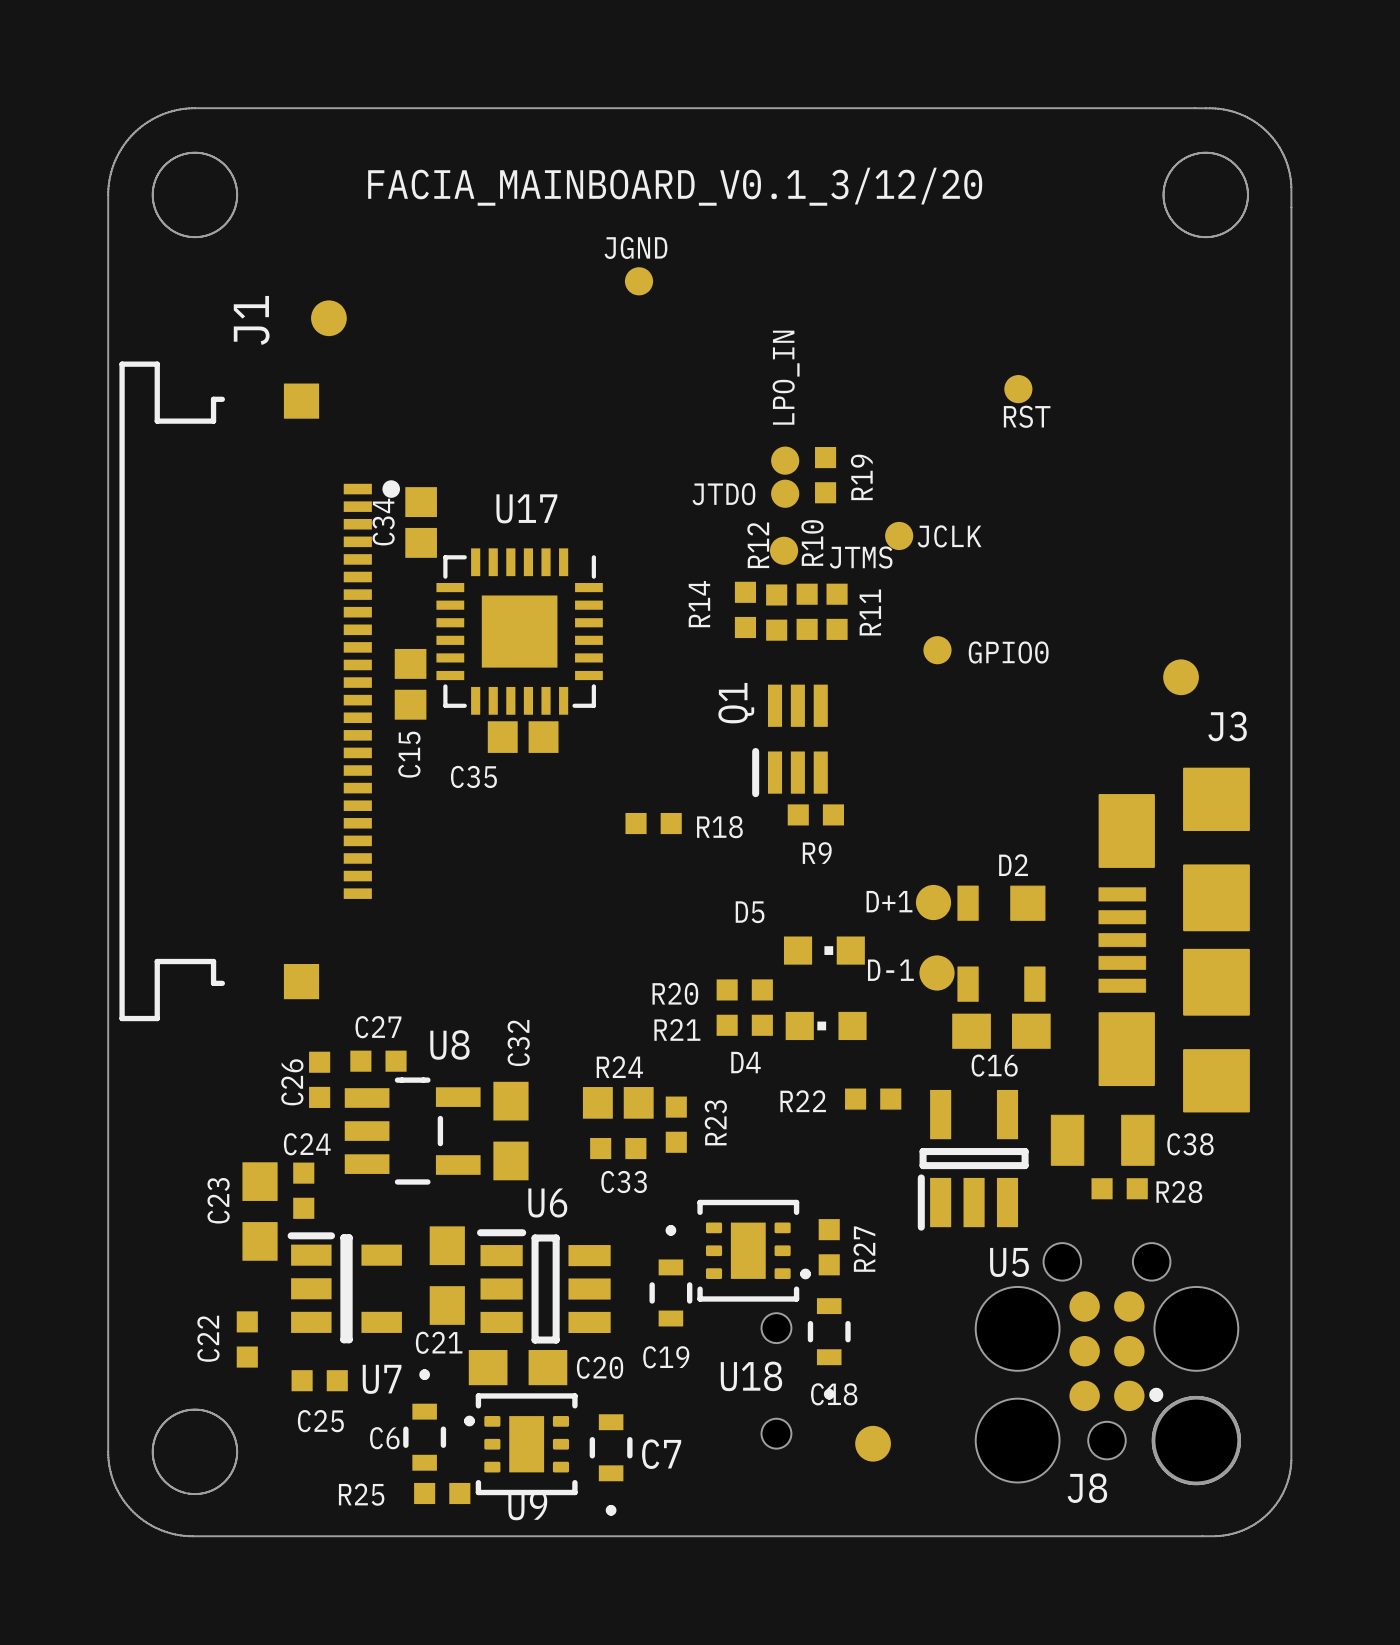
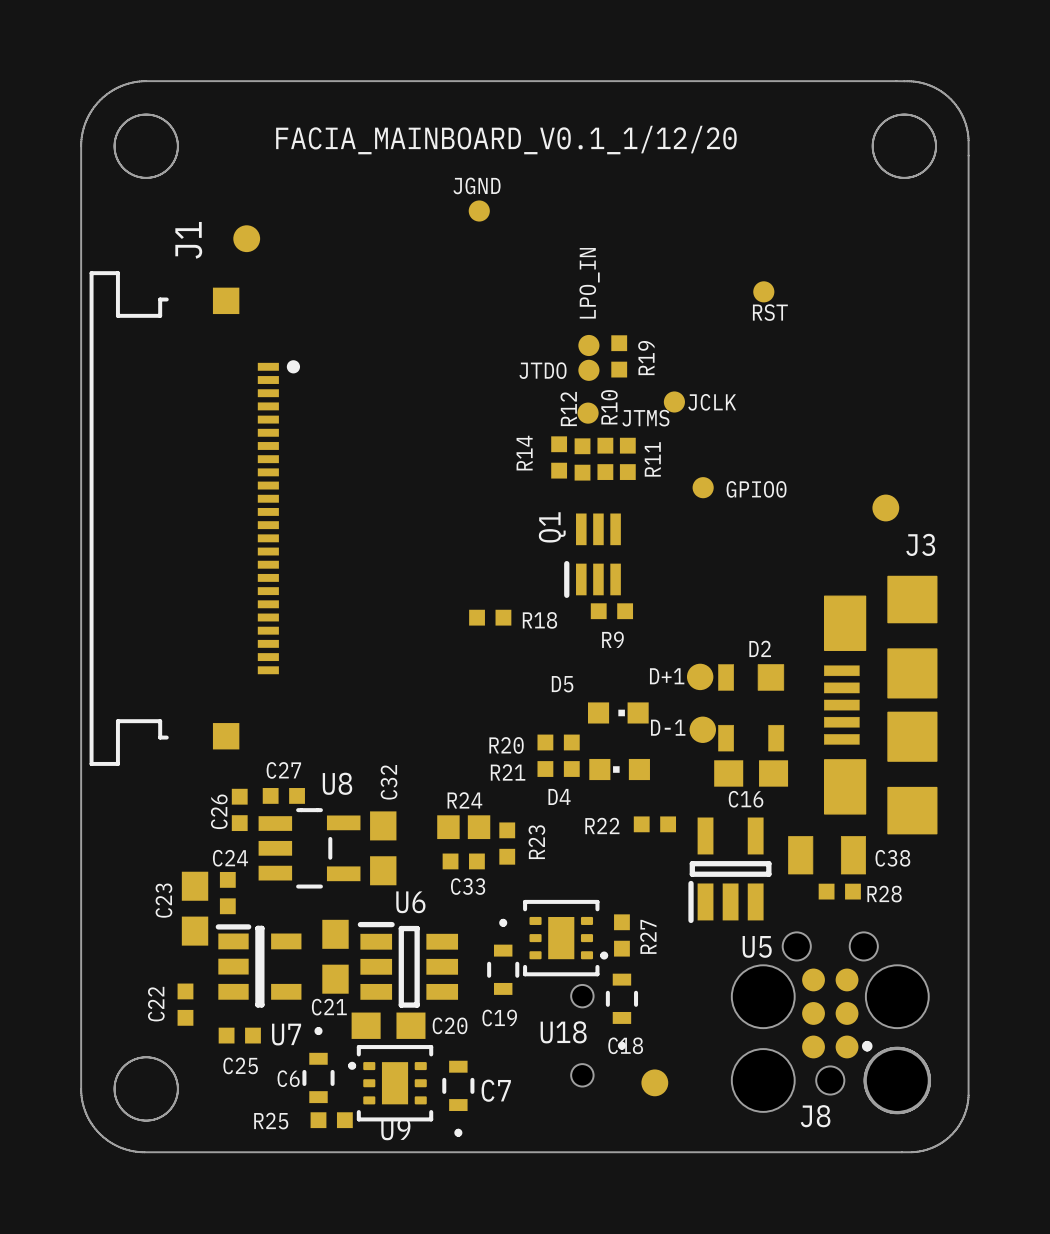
text: FACIA_MAINBOARD_V0.1_3/12/20 (675, 186) -> FACIA_MAINBOARD_V0.1_1/12/20 (506, 140)
C34: (421, 522) -> none
U17: (519, 631) -> none
C15: (410, 684) -> none
C35: (523, 737) -> none

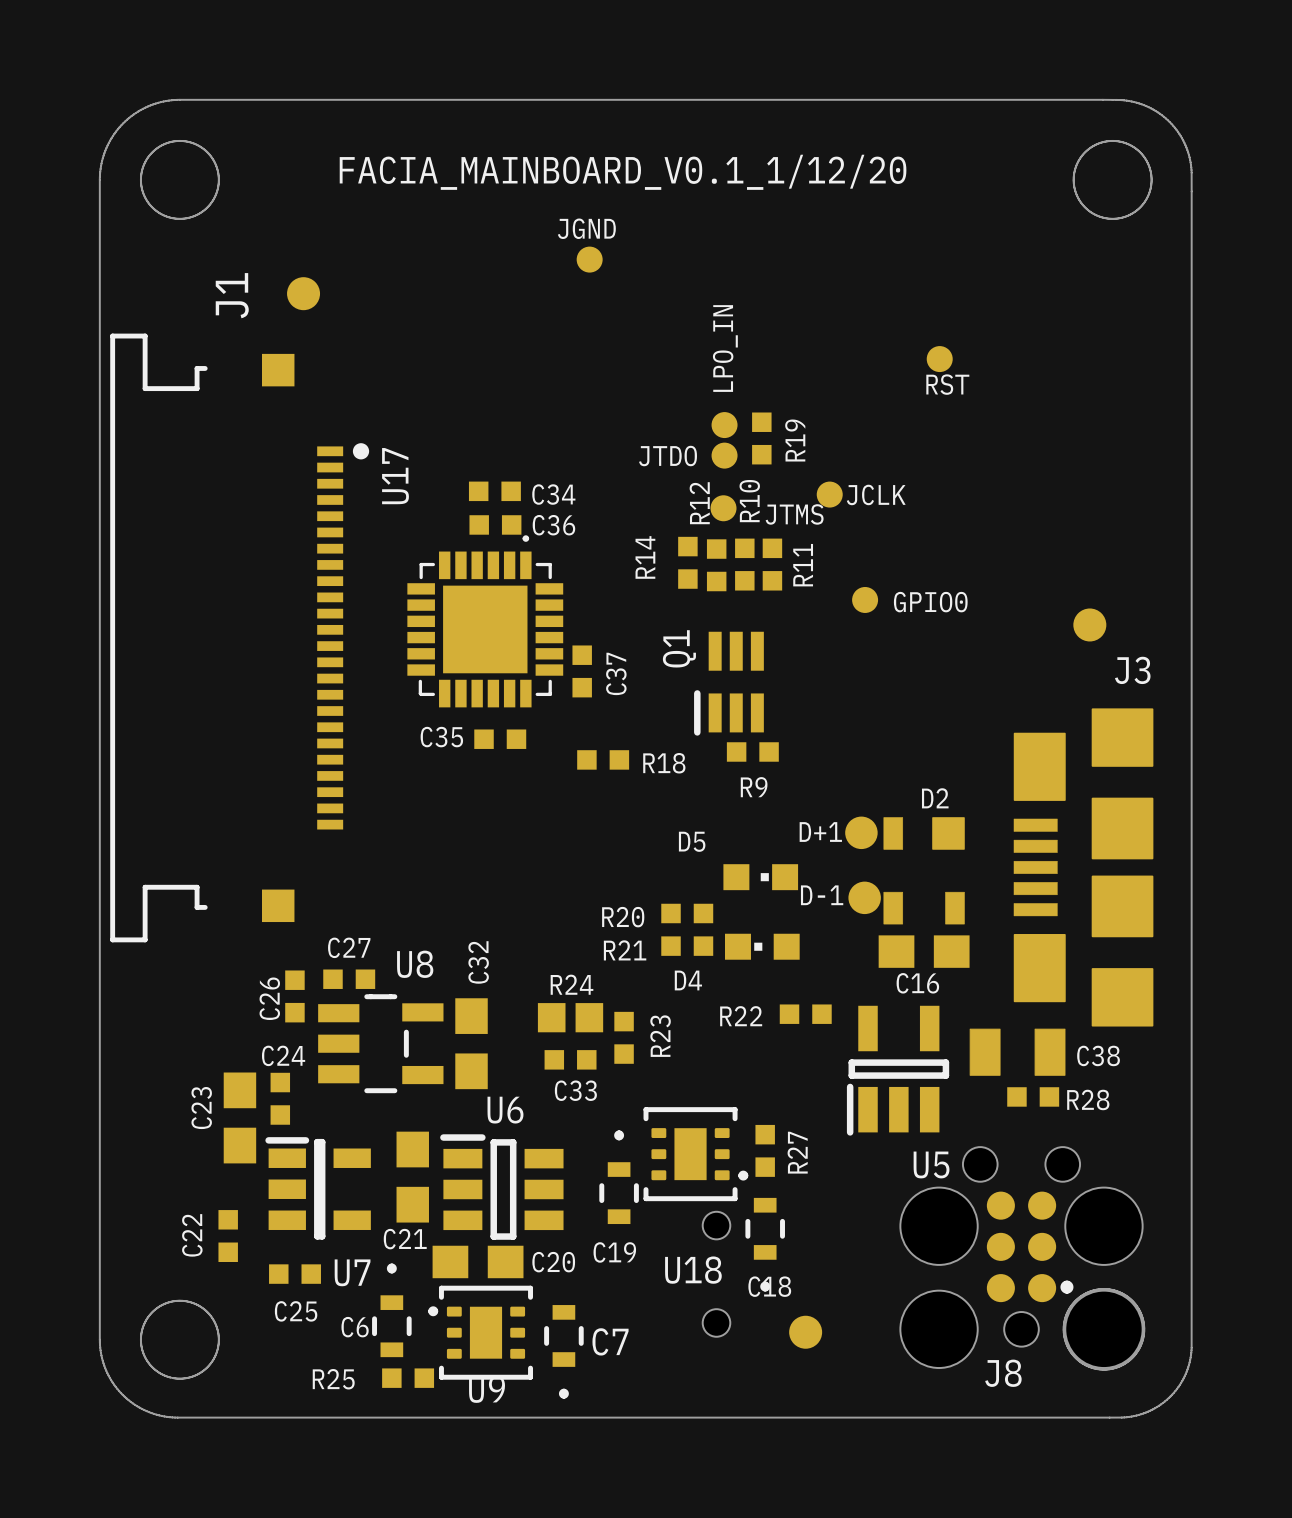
C34: none -> (494, 491)
C36: none -> (495, 524)
U17: none -> (485, 621)
C37: none -> (582, 671)
C35: none -> (500, 739)

